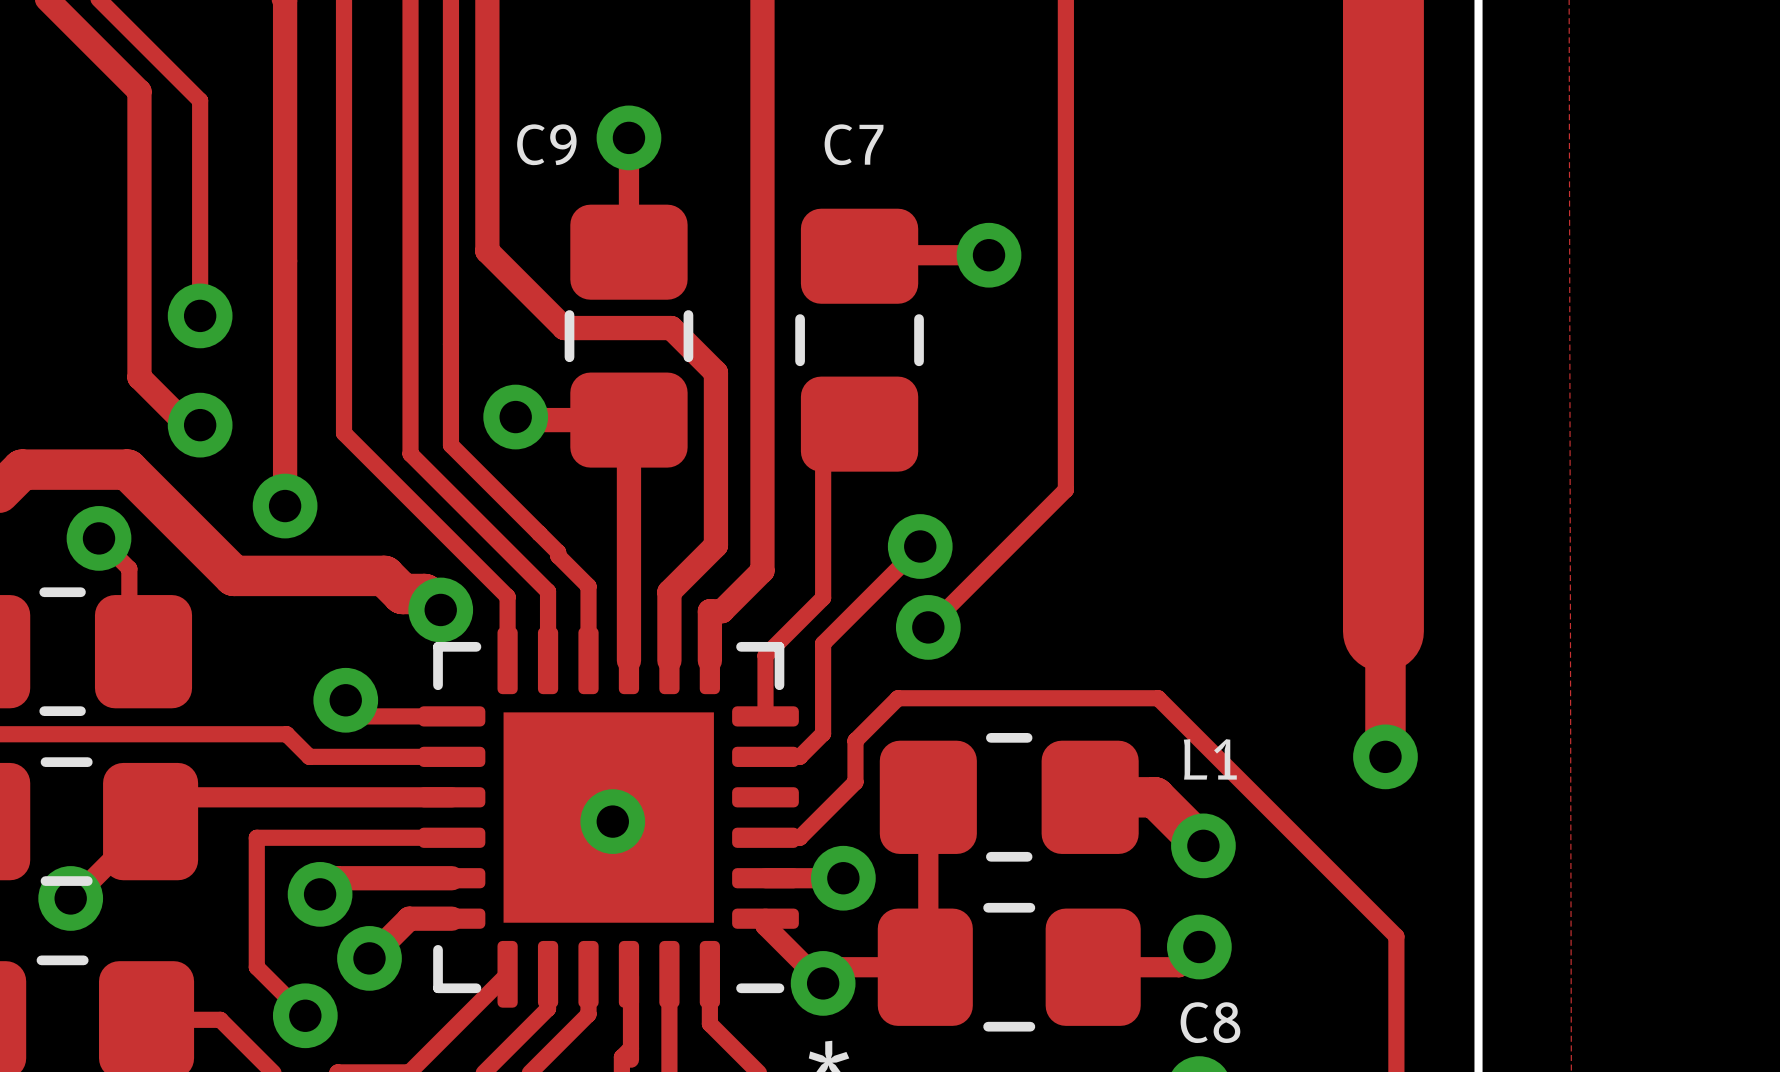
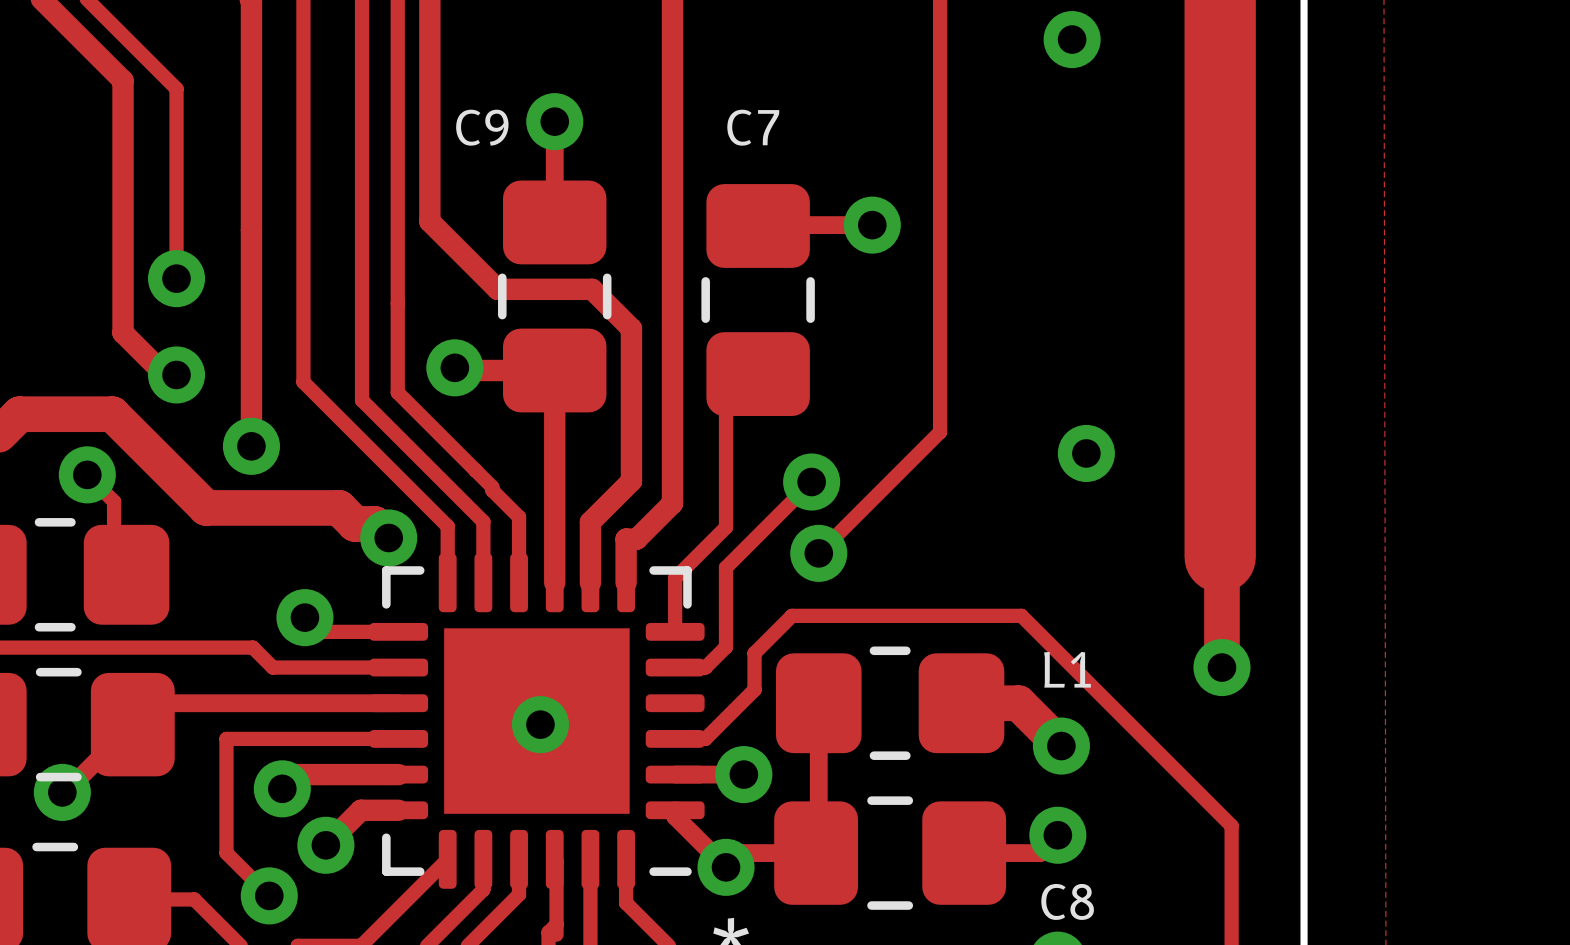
via: none -> (1072, 39)
via: none -> (1086, 453)

